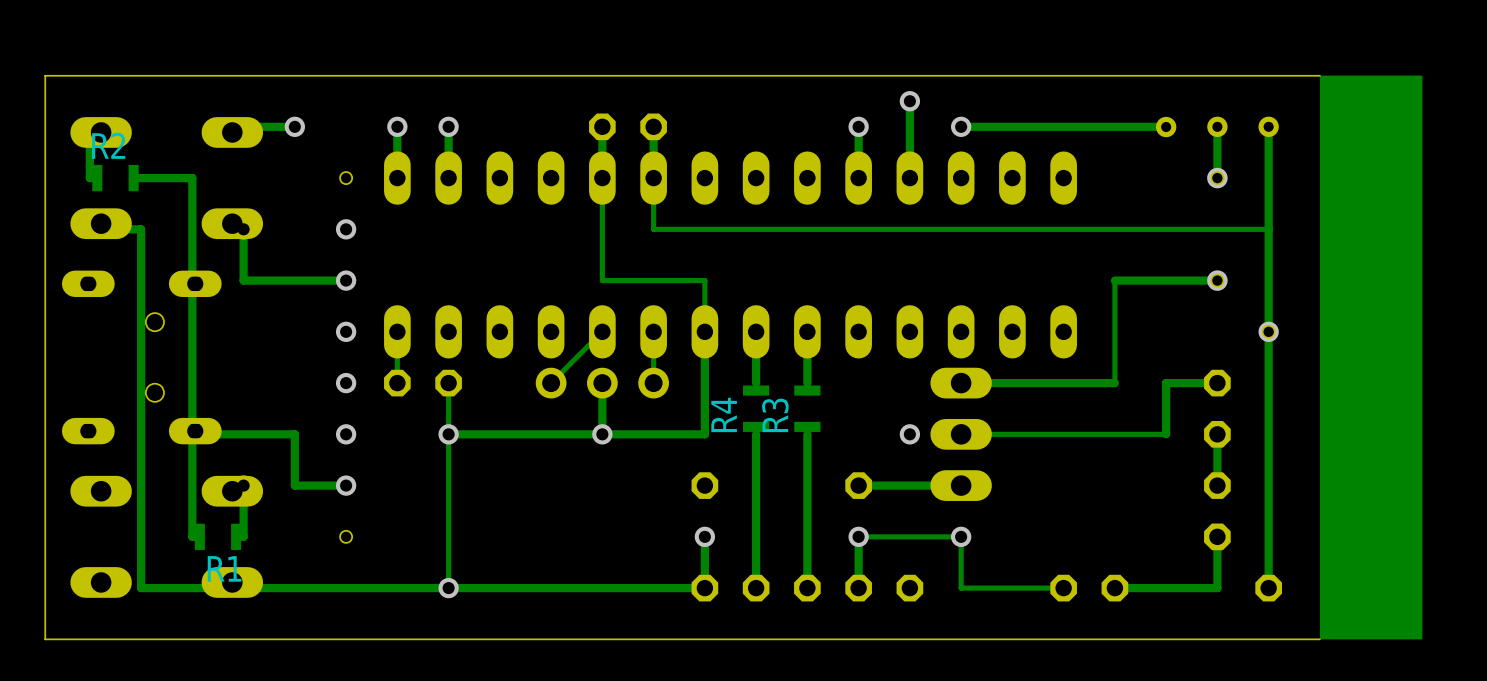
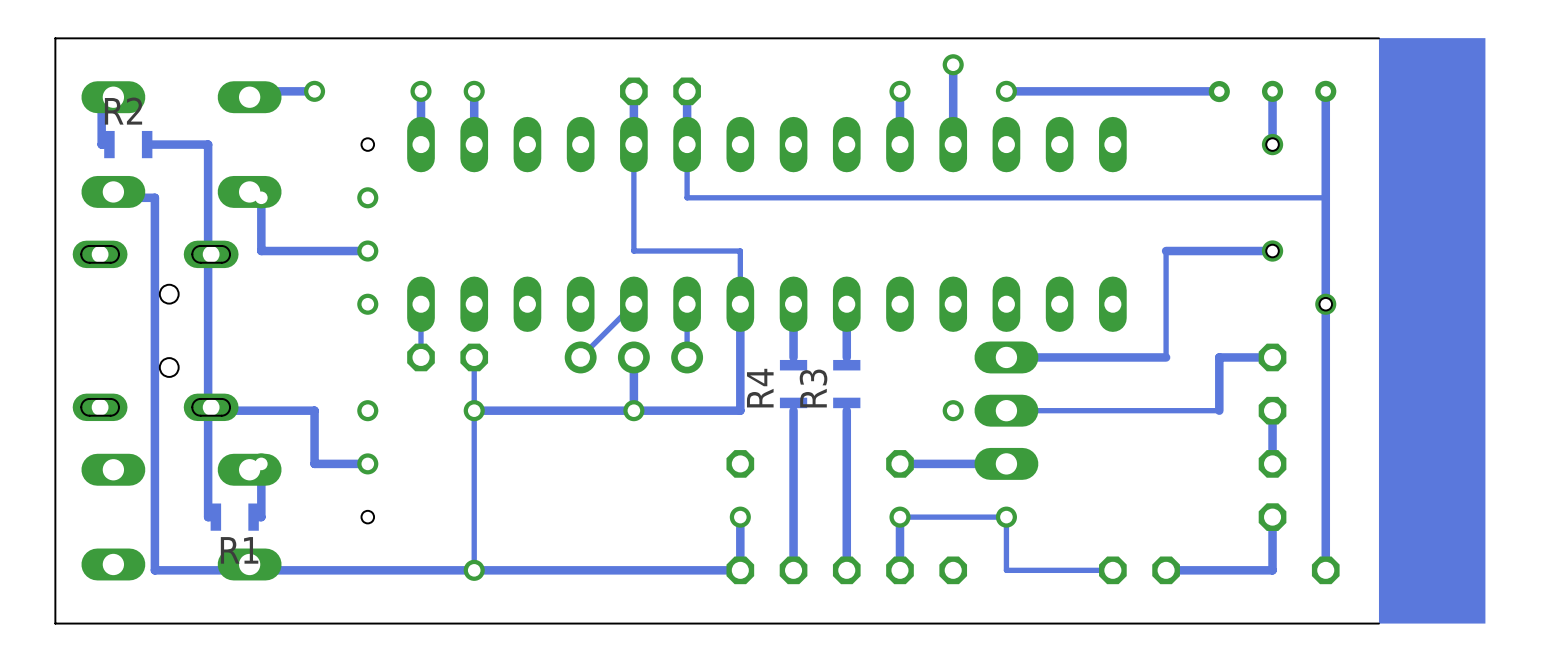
via: (346, 383) -> none

